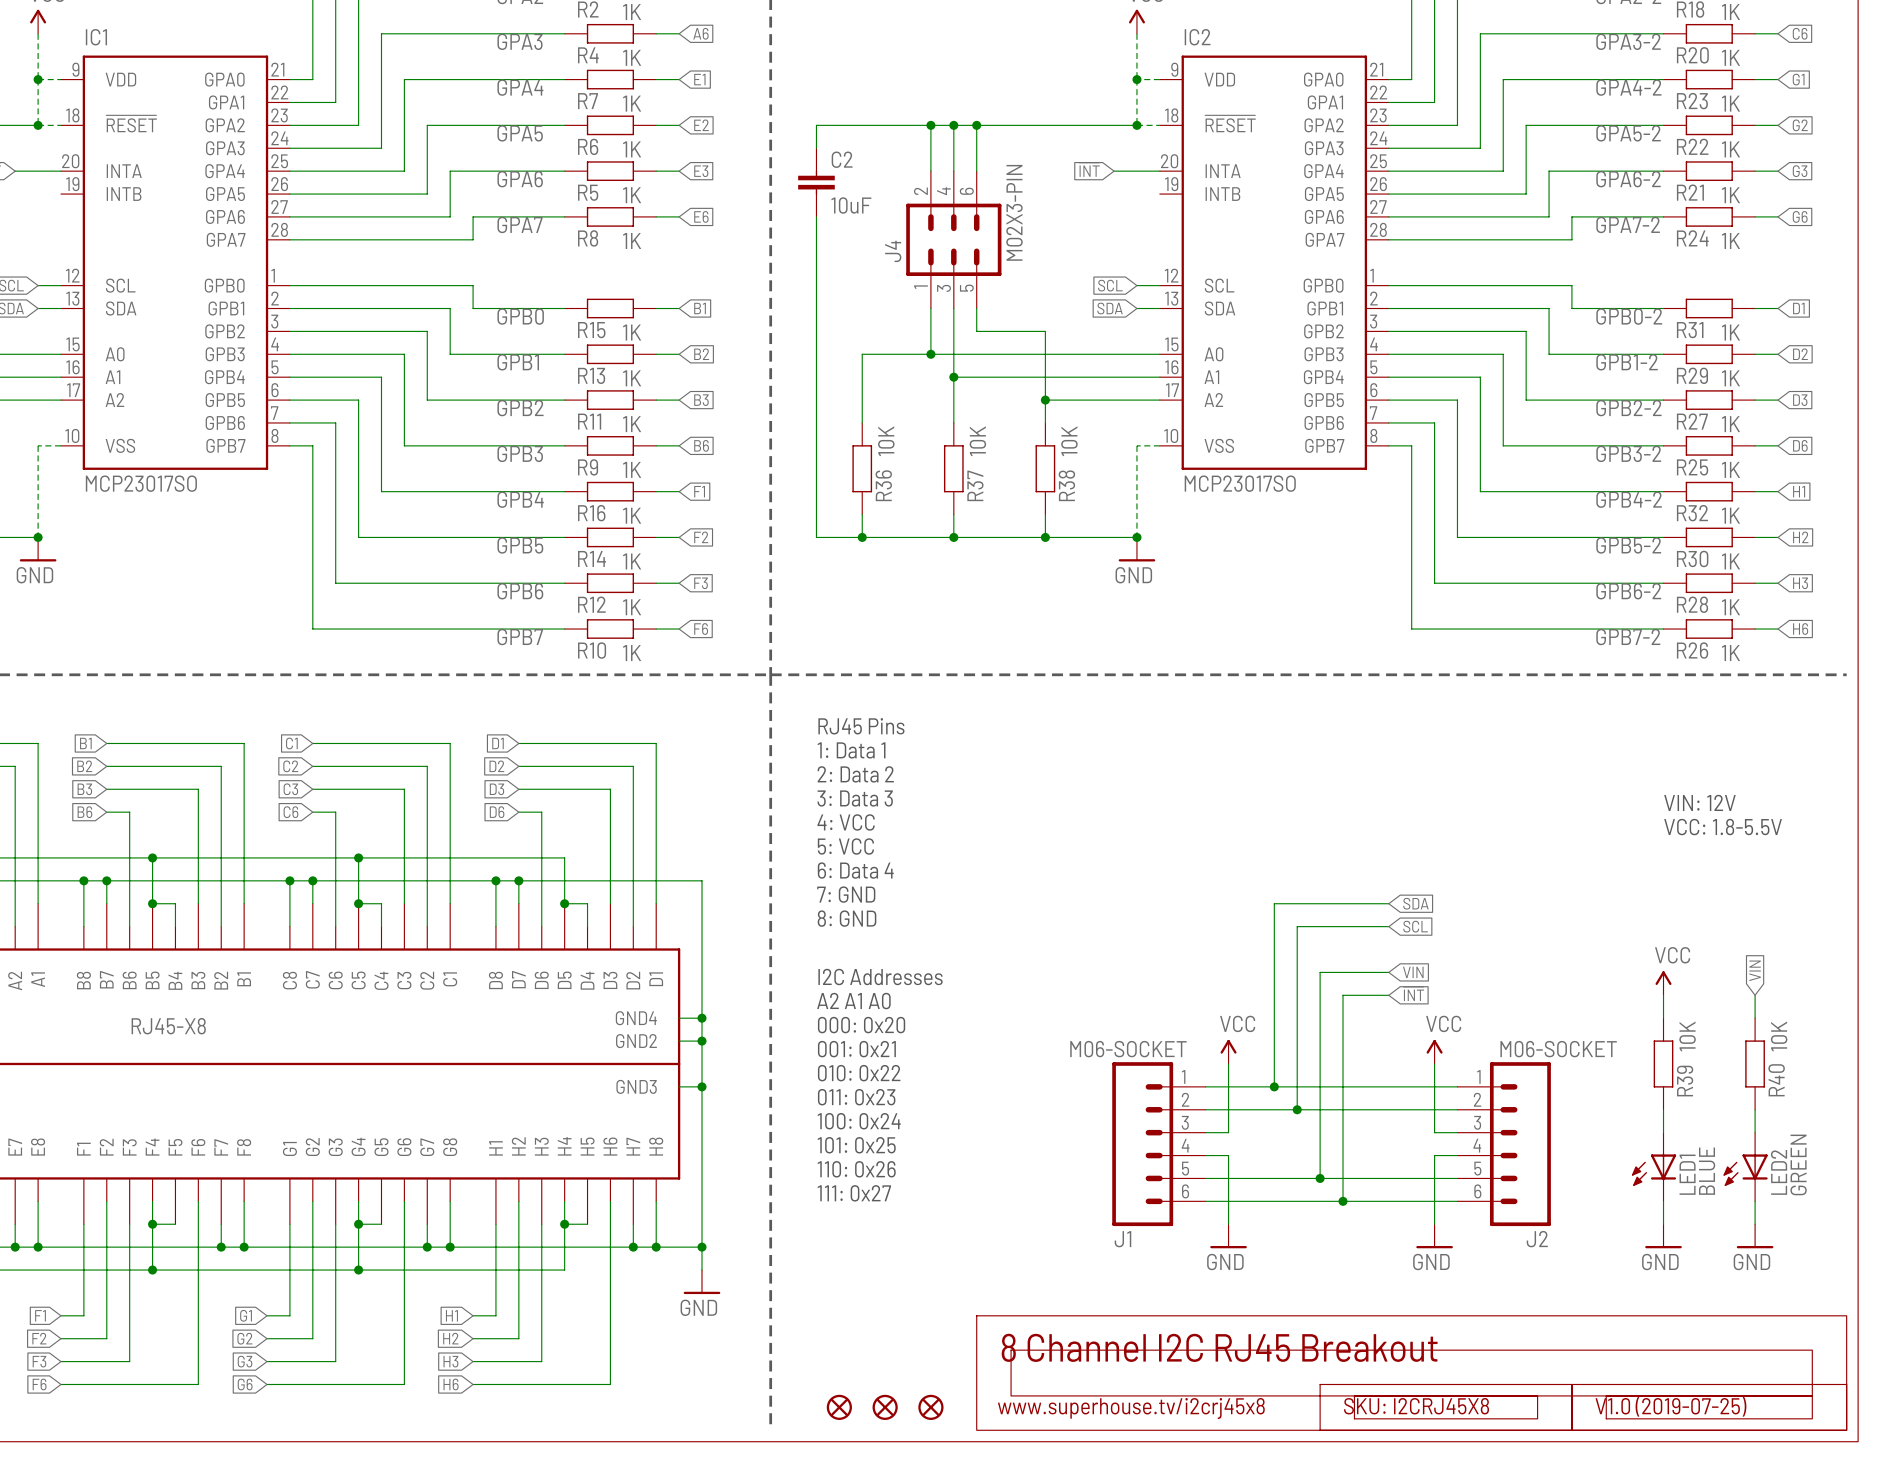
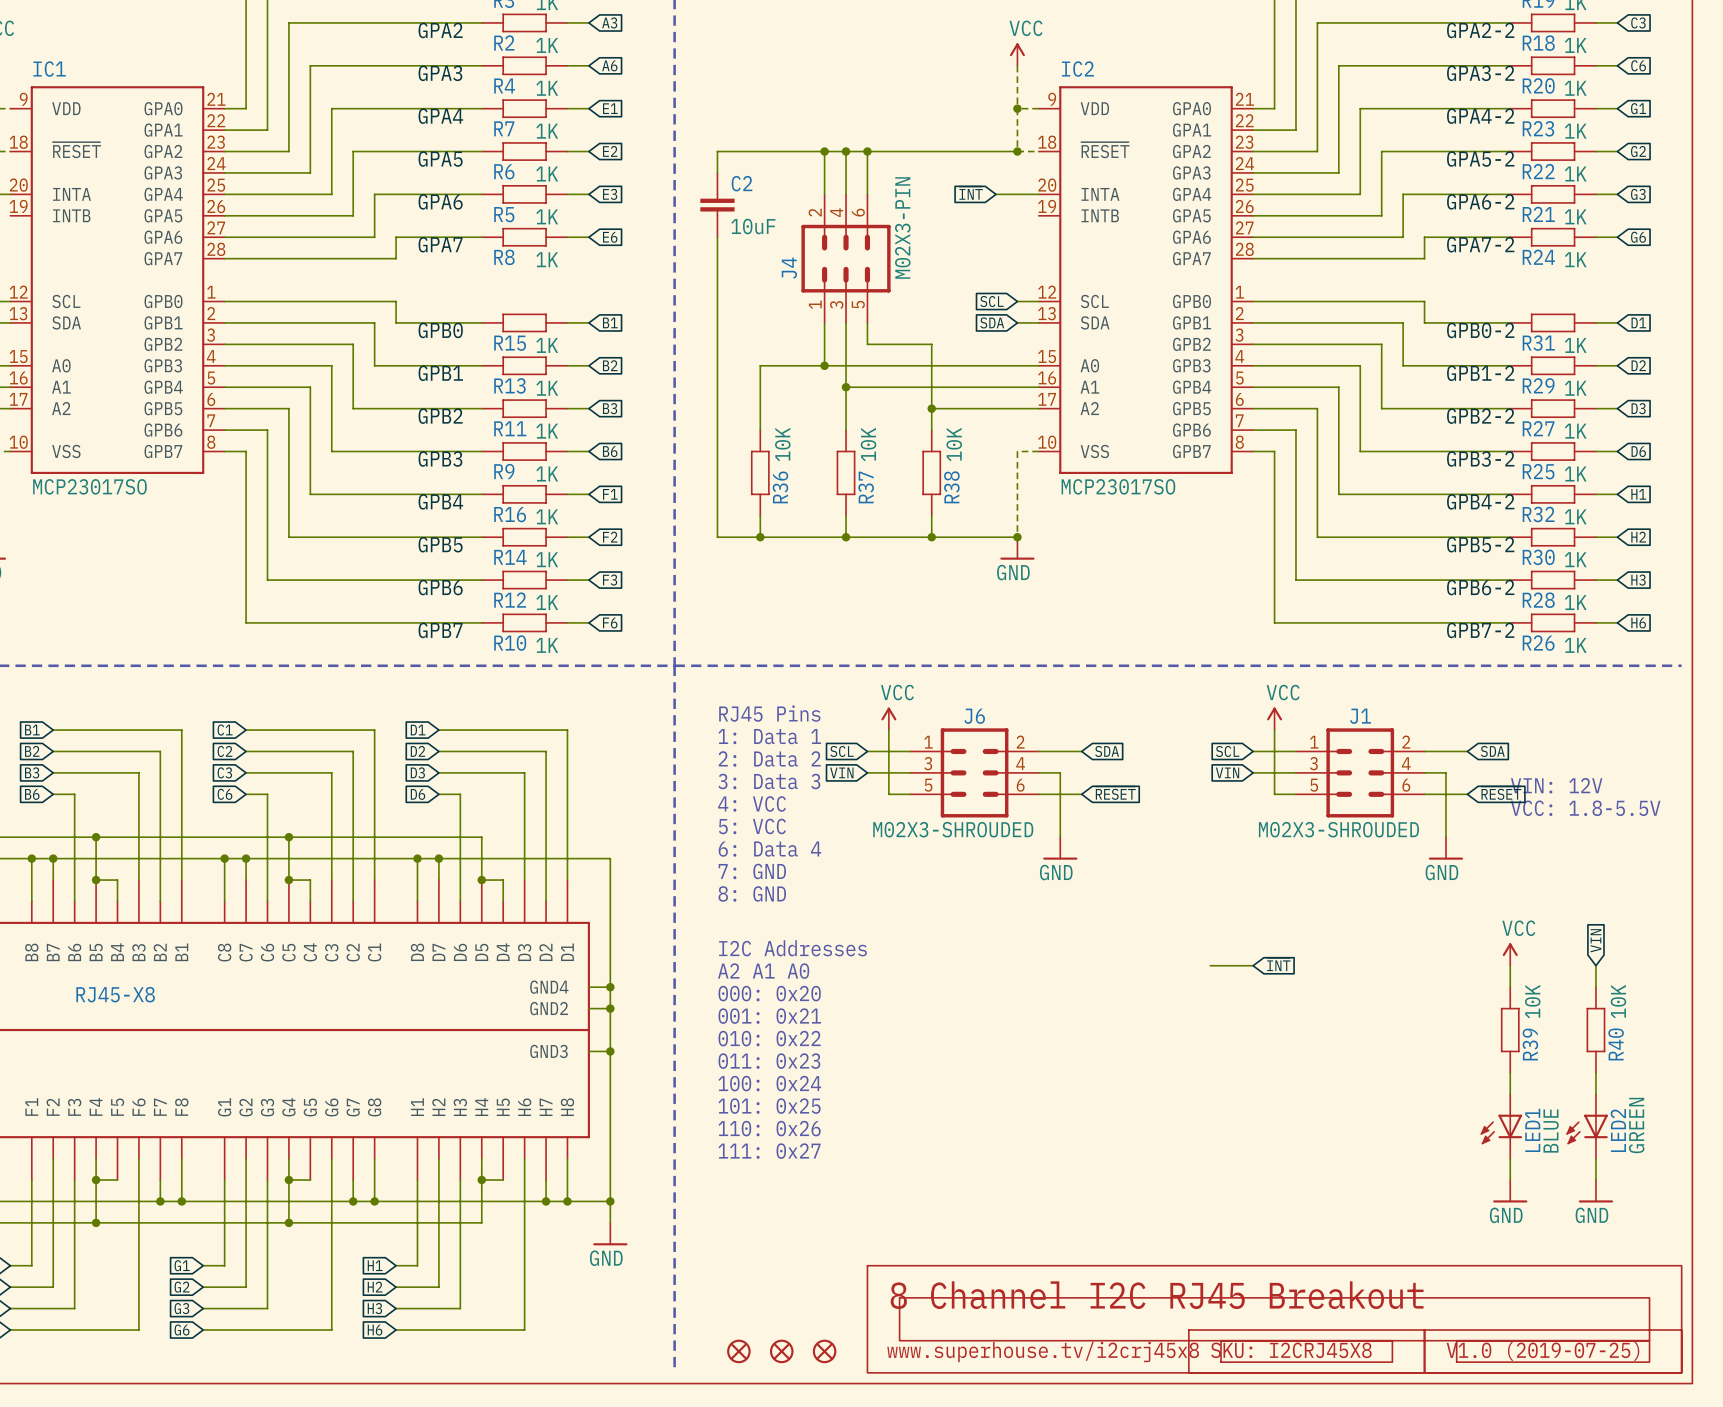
power symbol: none -> VCC (888, 718)
power symbol: none -> VCC (1274, 718)
wire: none -> (888, 730) (888, 794) (910, 794)
wire: none -> (1274, 730) (1274, 794) (1295, 794)
global label: none -> SCL (842, 751)
wire: none -> (867, 751) (910, 751)
wire: none -> (1038, 751) (1081, 751)
global label: none -> SDA (1107, 751)
wire: none -> (1253, 751) (1295, 751)
wire: none -> (1424, 751) (1467, 751)
global label: none -> SDA (1492, 751)
global label: none -> VIN (841, 772)
wire: none -> (867, 772) (910, 772)
J6: none -> M02X3-SHROUDED (974, 772)
wire: none -> (1038, 772) (1060, 772) (1060, 837)
wire: none -> (1253, 772) (1295, 772)
wire: none -> (1424, 772) (1445, 772) (1445, 837)
global label: none -> ~{RESET} (1115, 793)
global label: none -> ~{RESET} (1501, 793)
wire: none -> (1038, 794) (1081, 794)
wire: none -> (1424, 794) (1467, 794)
power symbol: none -> GND (1060, 848)
power symbol: none -> GND (1445, 848)
wire: (1388, 903) (1274, 903) (1274, 1086) -> none
global label: SDA (1415, 903) -> none
wire: (1388, 926) (1297, 926) (1297, 1109) -> none
global label rotation: 0° (1415, 926) -> 180° (1227, 751)
global label position: SCL (1415, 926) -> SCL (1227, 751)
wire: (1388, 972) (1320, 972) (1320, 1178) -> none
global label rotation: 0° (1413, 972) -> 180° (1227, 772)
global label position: VIN (1413, 972) -> VIN (1227, 772)
wire: (1343, 995) (1343, 1201) -> none
J1 value: M06-SOCKET (1128, 1049) -> M02X3-SHROUDED (1338, 829)
power symbol: VCC (1228, 1051) -> none
power symbol: VCC (1434, 1051) -> none
J1 symbol: [1112, 1062, 1206, 1227] -> [1295, 728, 1425, 818]
wire: (1228, 1063) (1228, 1132) (1205, 1132) -> none
wire: (1434, 1063) (1434, 1132) (1457, 1132) -> none
wire: (1205, 1086) (1457, 1086) -> none
junction: (1274, 1086) -> none
wire: (1205, 1109) (1457, 1109) -> none
junction: (1297, 1109) -> none
J2: M06-SOCKET (1504, 1144) -> none
wire: (1205, 1155) (1228, 1155) (1228, 1224) -> none
wire: (1457, 1155) (1434, 1155) (1434, 1224) -> none
wire: (1205, 1178) (1457, 1178) -> none
junction: (1320, 1178) -> none
wire: (1205, 1201) (1457, 1201) -> none
junction: (1343, 1201) -> none
power symbol: GND (1228, 1236) -> none
power symbol: GND (1434, 1236) -> none
J1 name position: J1 (1122, 1239) -> J1 (1360, 716)

